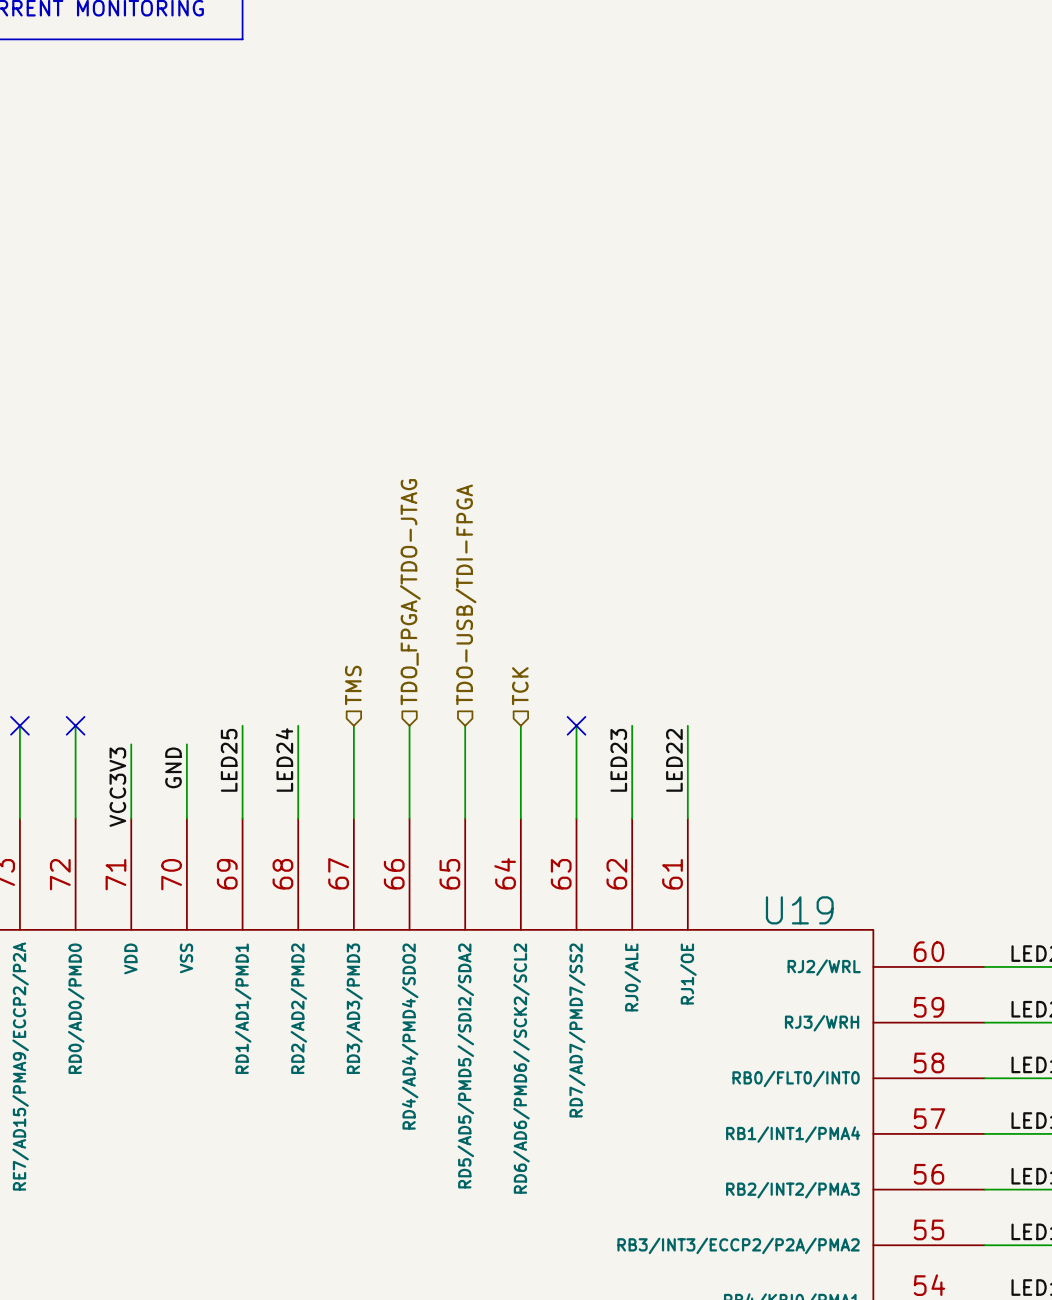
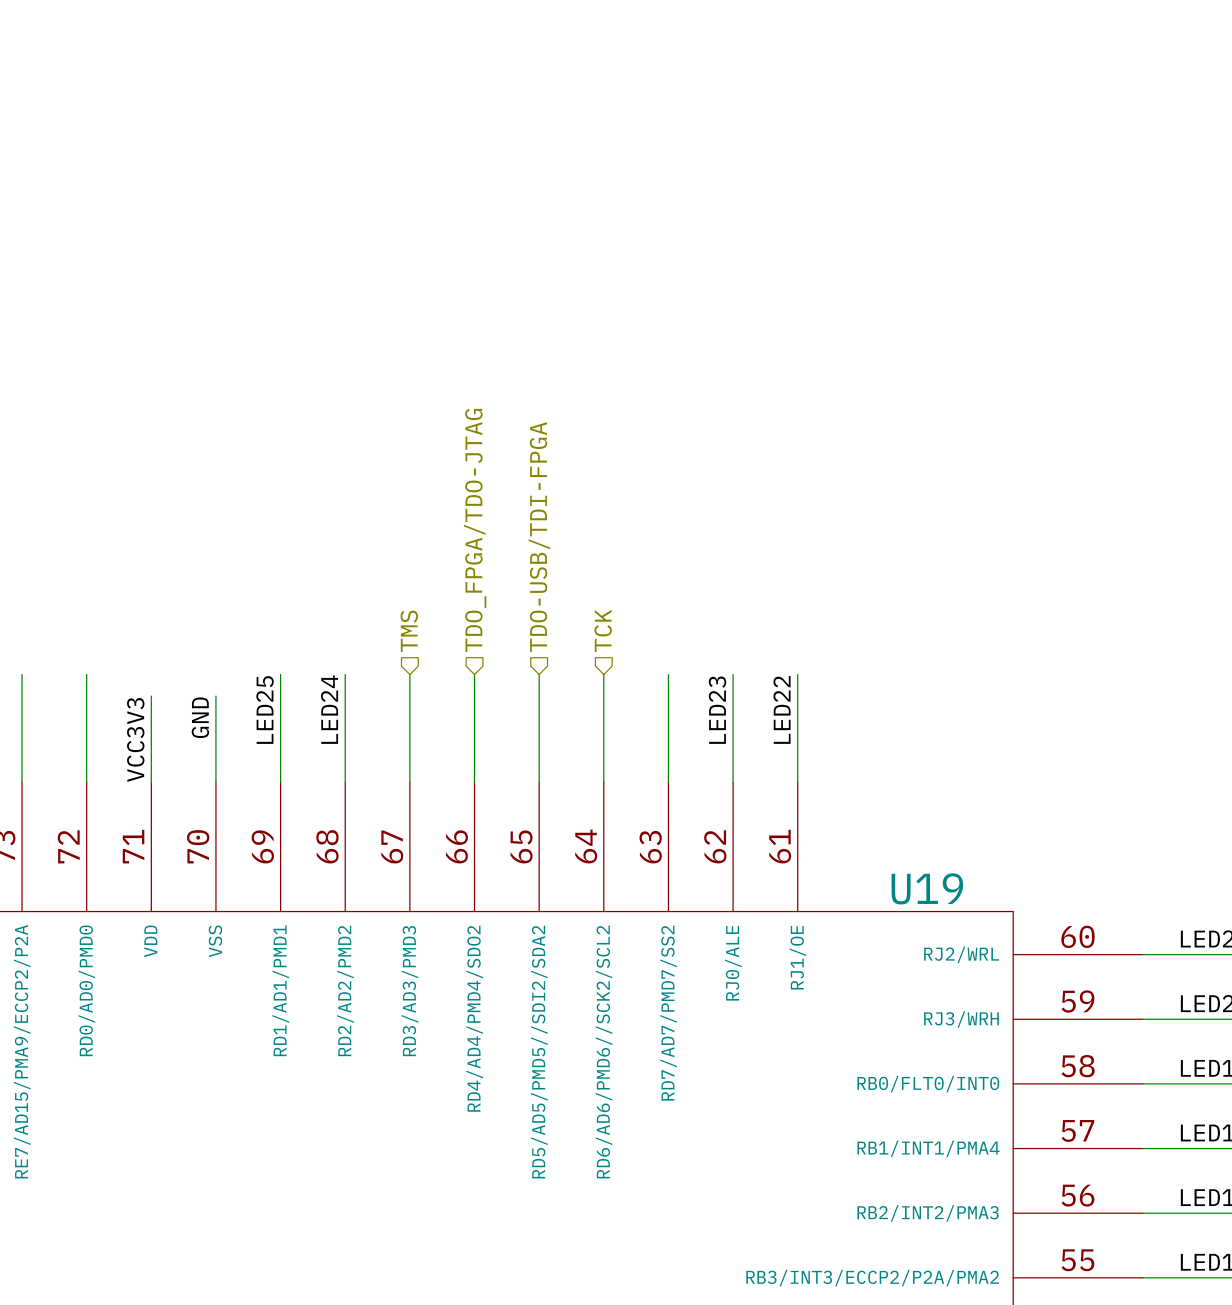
no-connect mark: (19, 725) -> none
no-connect mark: (75, 725) -> none
no-connect mark: (576, 725) -> none

